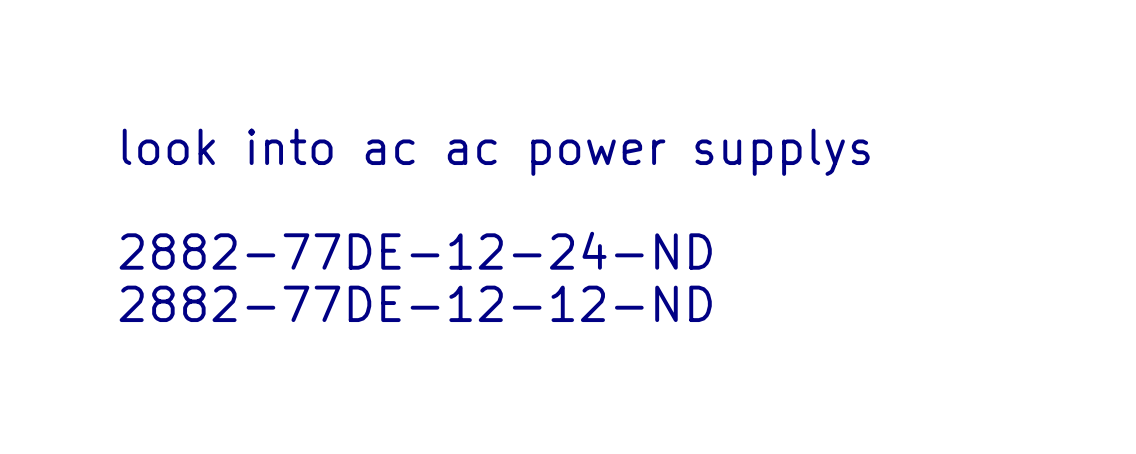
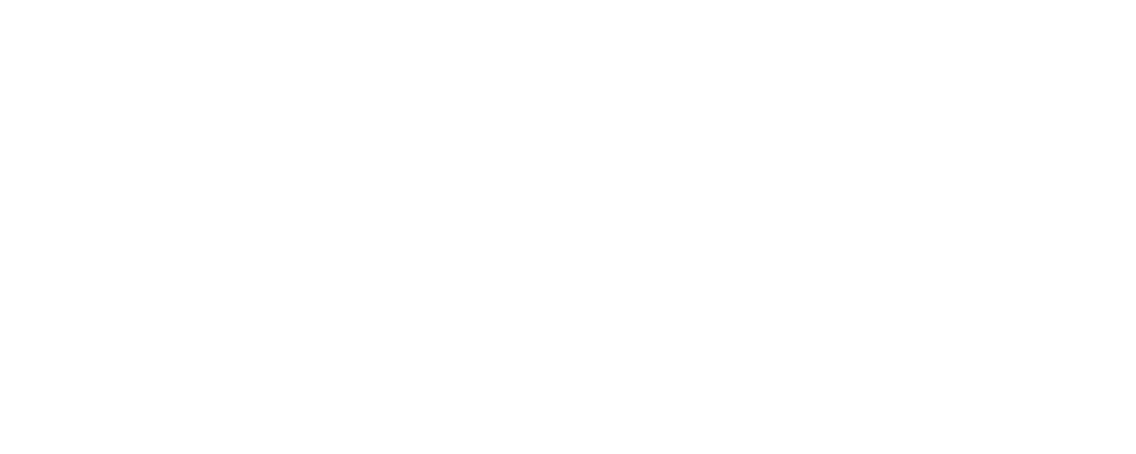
text: look into ac ac power supplys (496, 152) -> none
text: 2882-77DE-12-24-ND (415, 250) -> none
text: 2882-77DE-12-12-ND (415, 303) -> none

